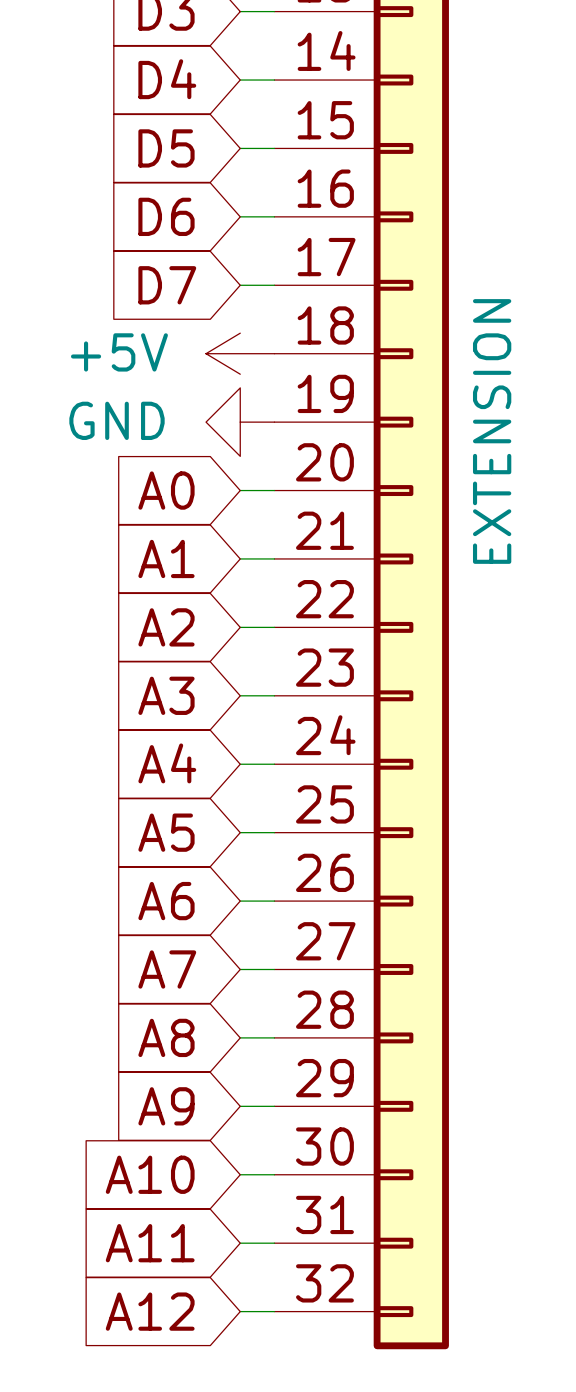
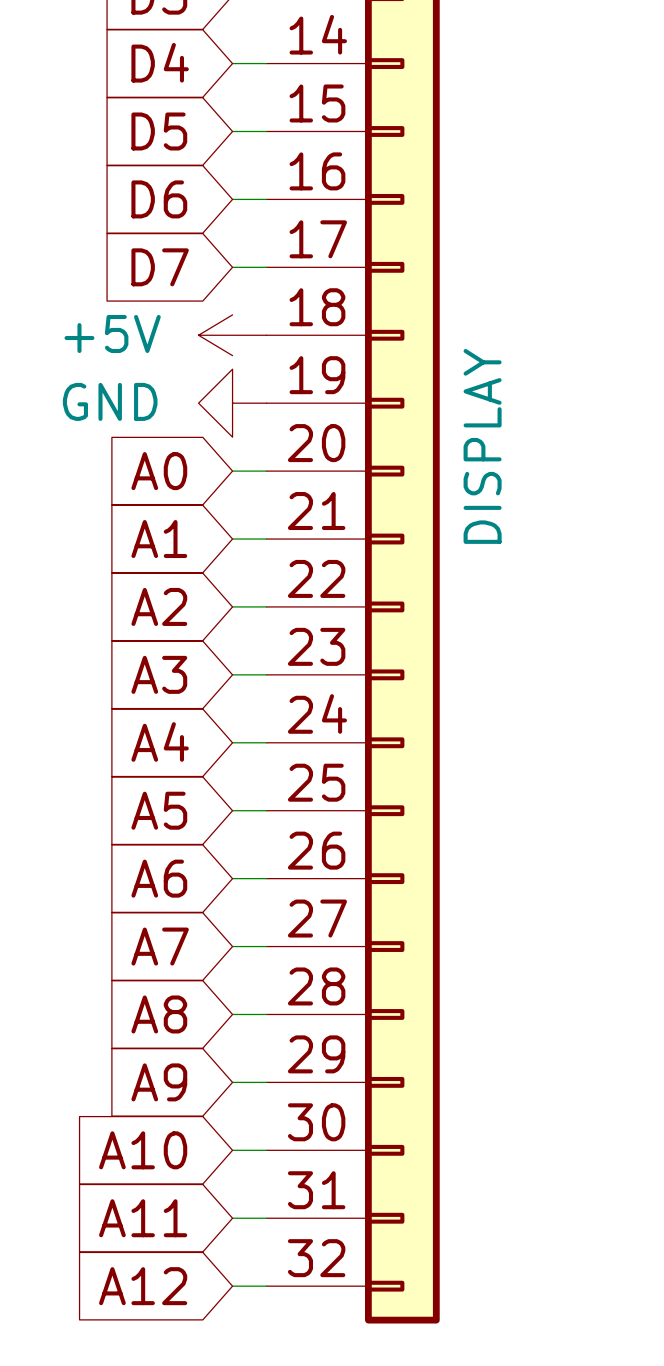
part value: EXTENSION (492, 431) -> DISPLAY (482, 446)

